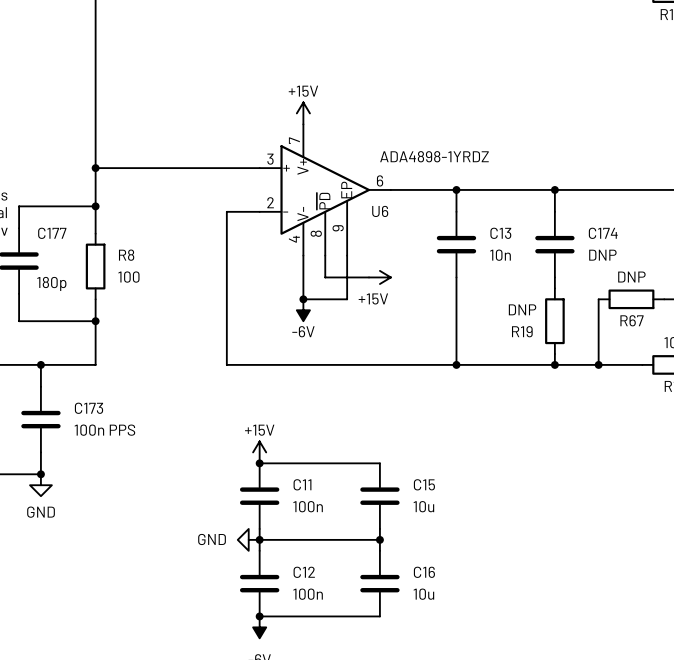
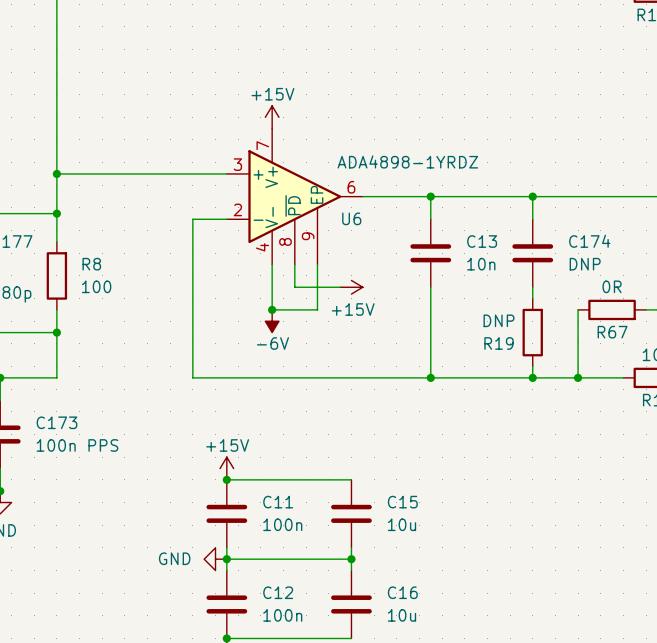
R67 value: DNP (631, 277) -> 0R (612, 286)

